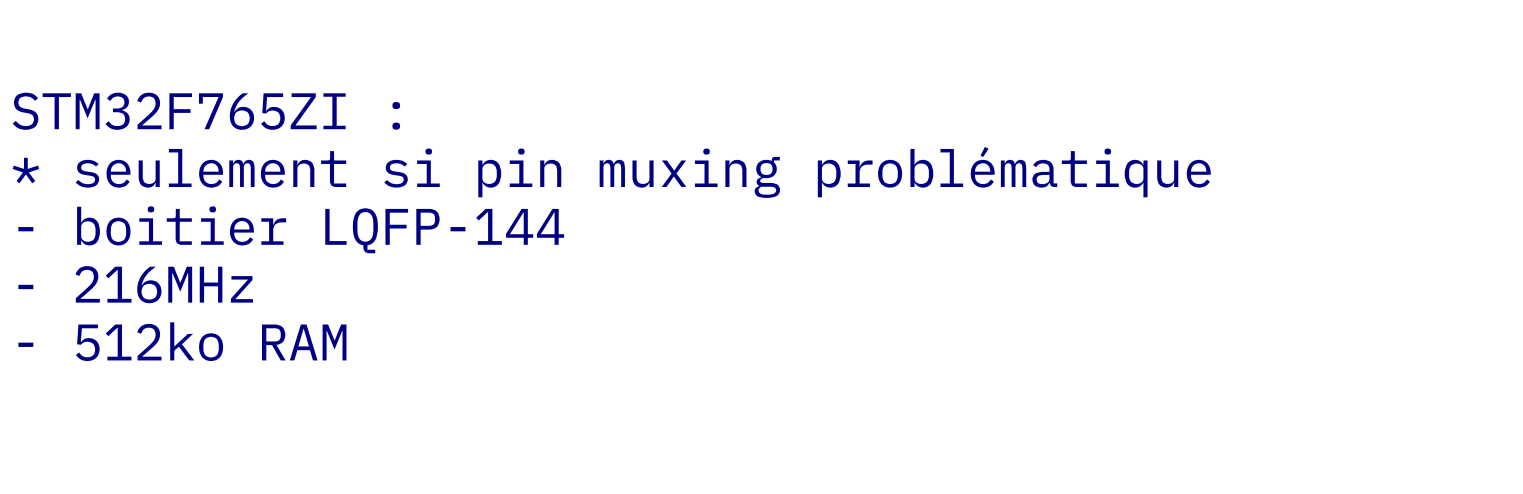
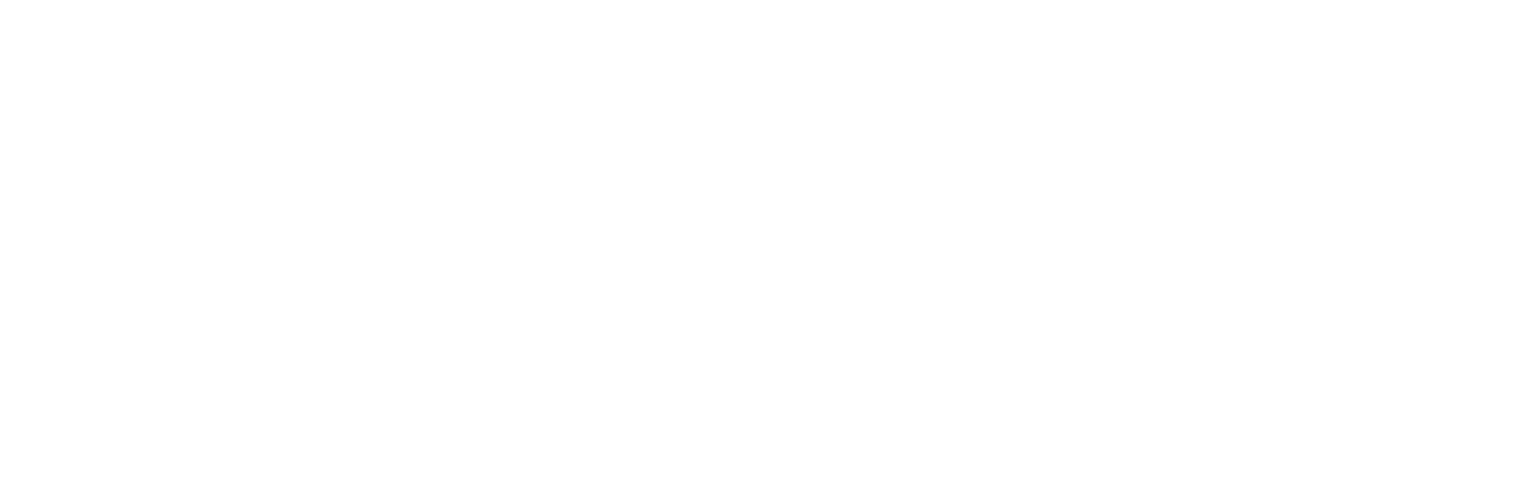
text: STM32F765ZI : (206, 111) -> none
text: * seulement si pin muxing problématique (611, 172) -> none
text: - boitier LQFP-144 (291, 229) -> none
text: - 216MHz (135, 284) -> none
text: - 512ko RAM (182, 341) -> none

